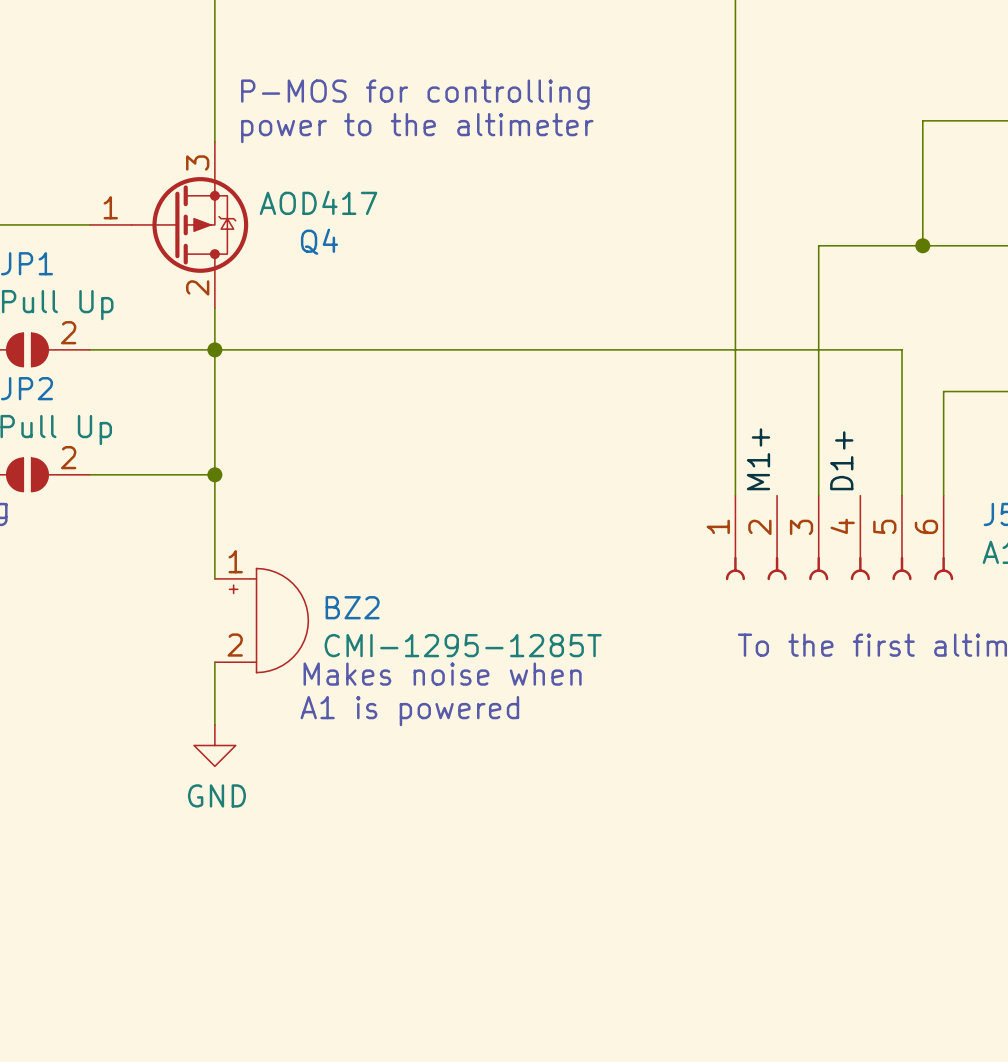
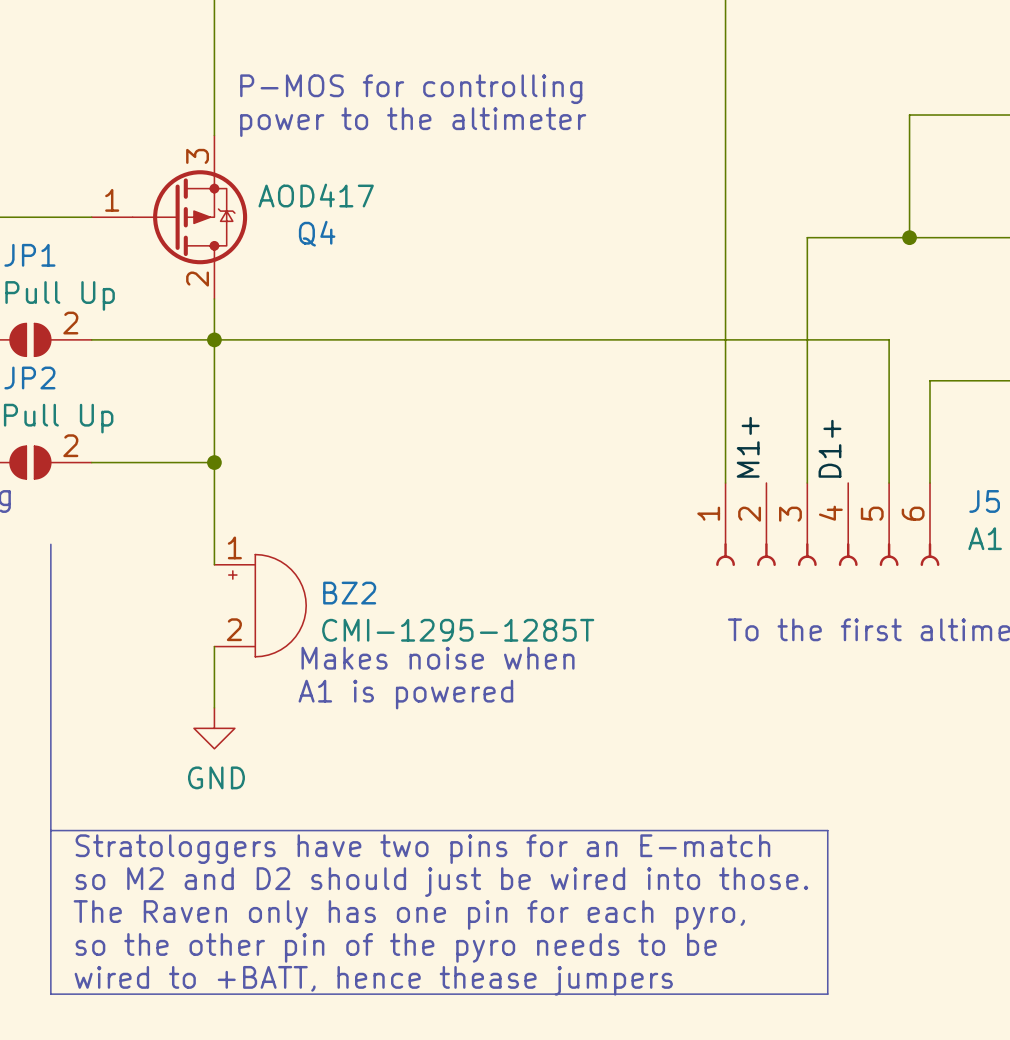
line: none -> (50, 544) (50, 994) (827, 994) (827, 830) (50, 830)
text: none -> Stratologgers have two pins for an E-match (422, 849)
text: none -> so M2 and D2 should just be wired into those. (441, 882)
text: none -> The Raven only has one pin for each pyro, (409, 914)
text: none -> so the other pin of the pyro needs to be (396, 947)
text: none -> wired to +BATT, hence thease jumpers (373, 980)

